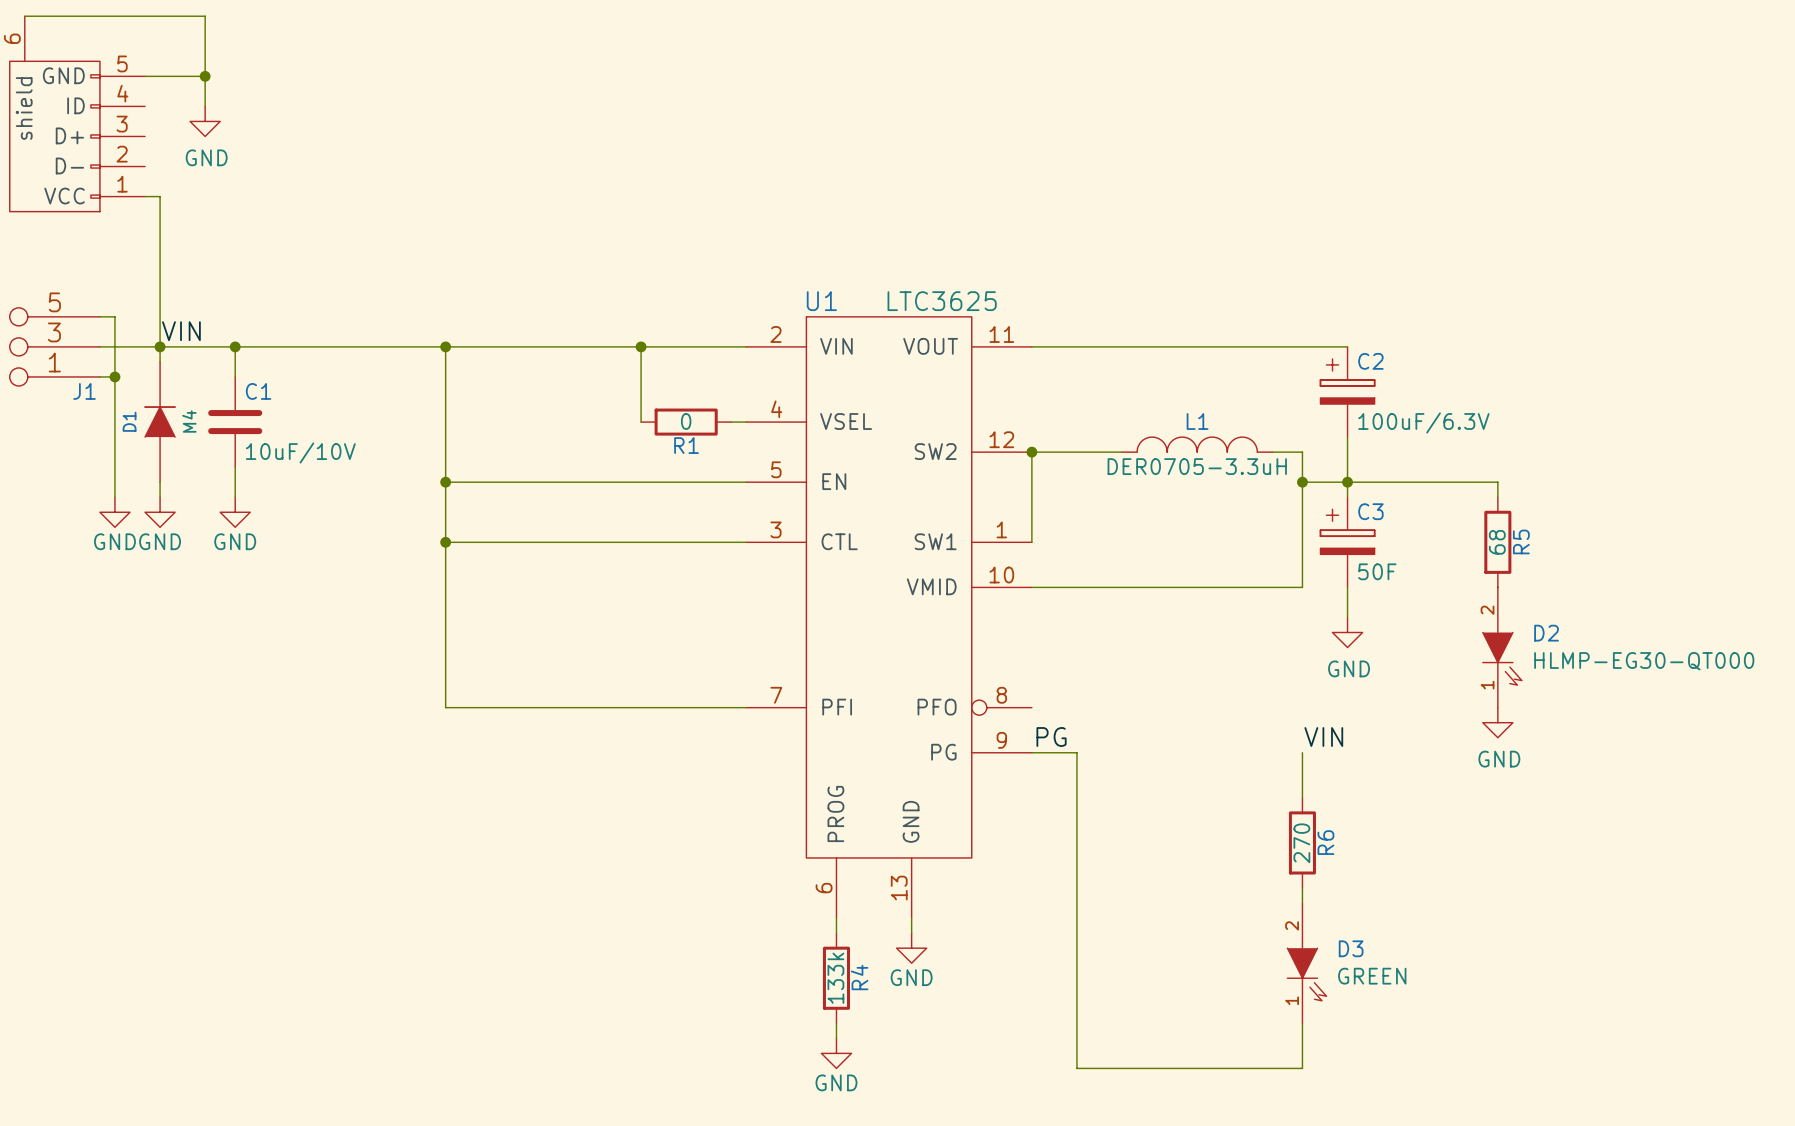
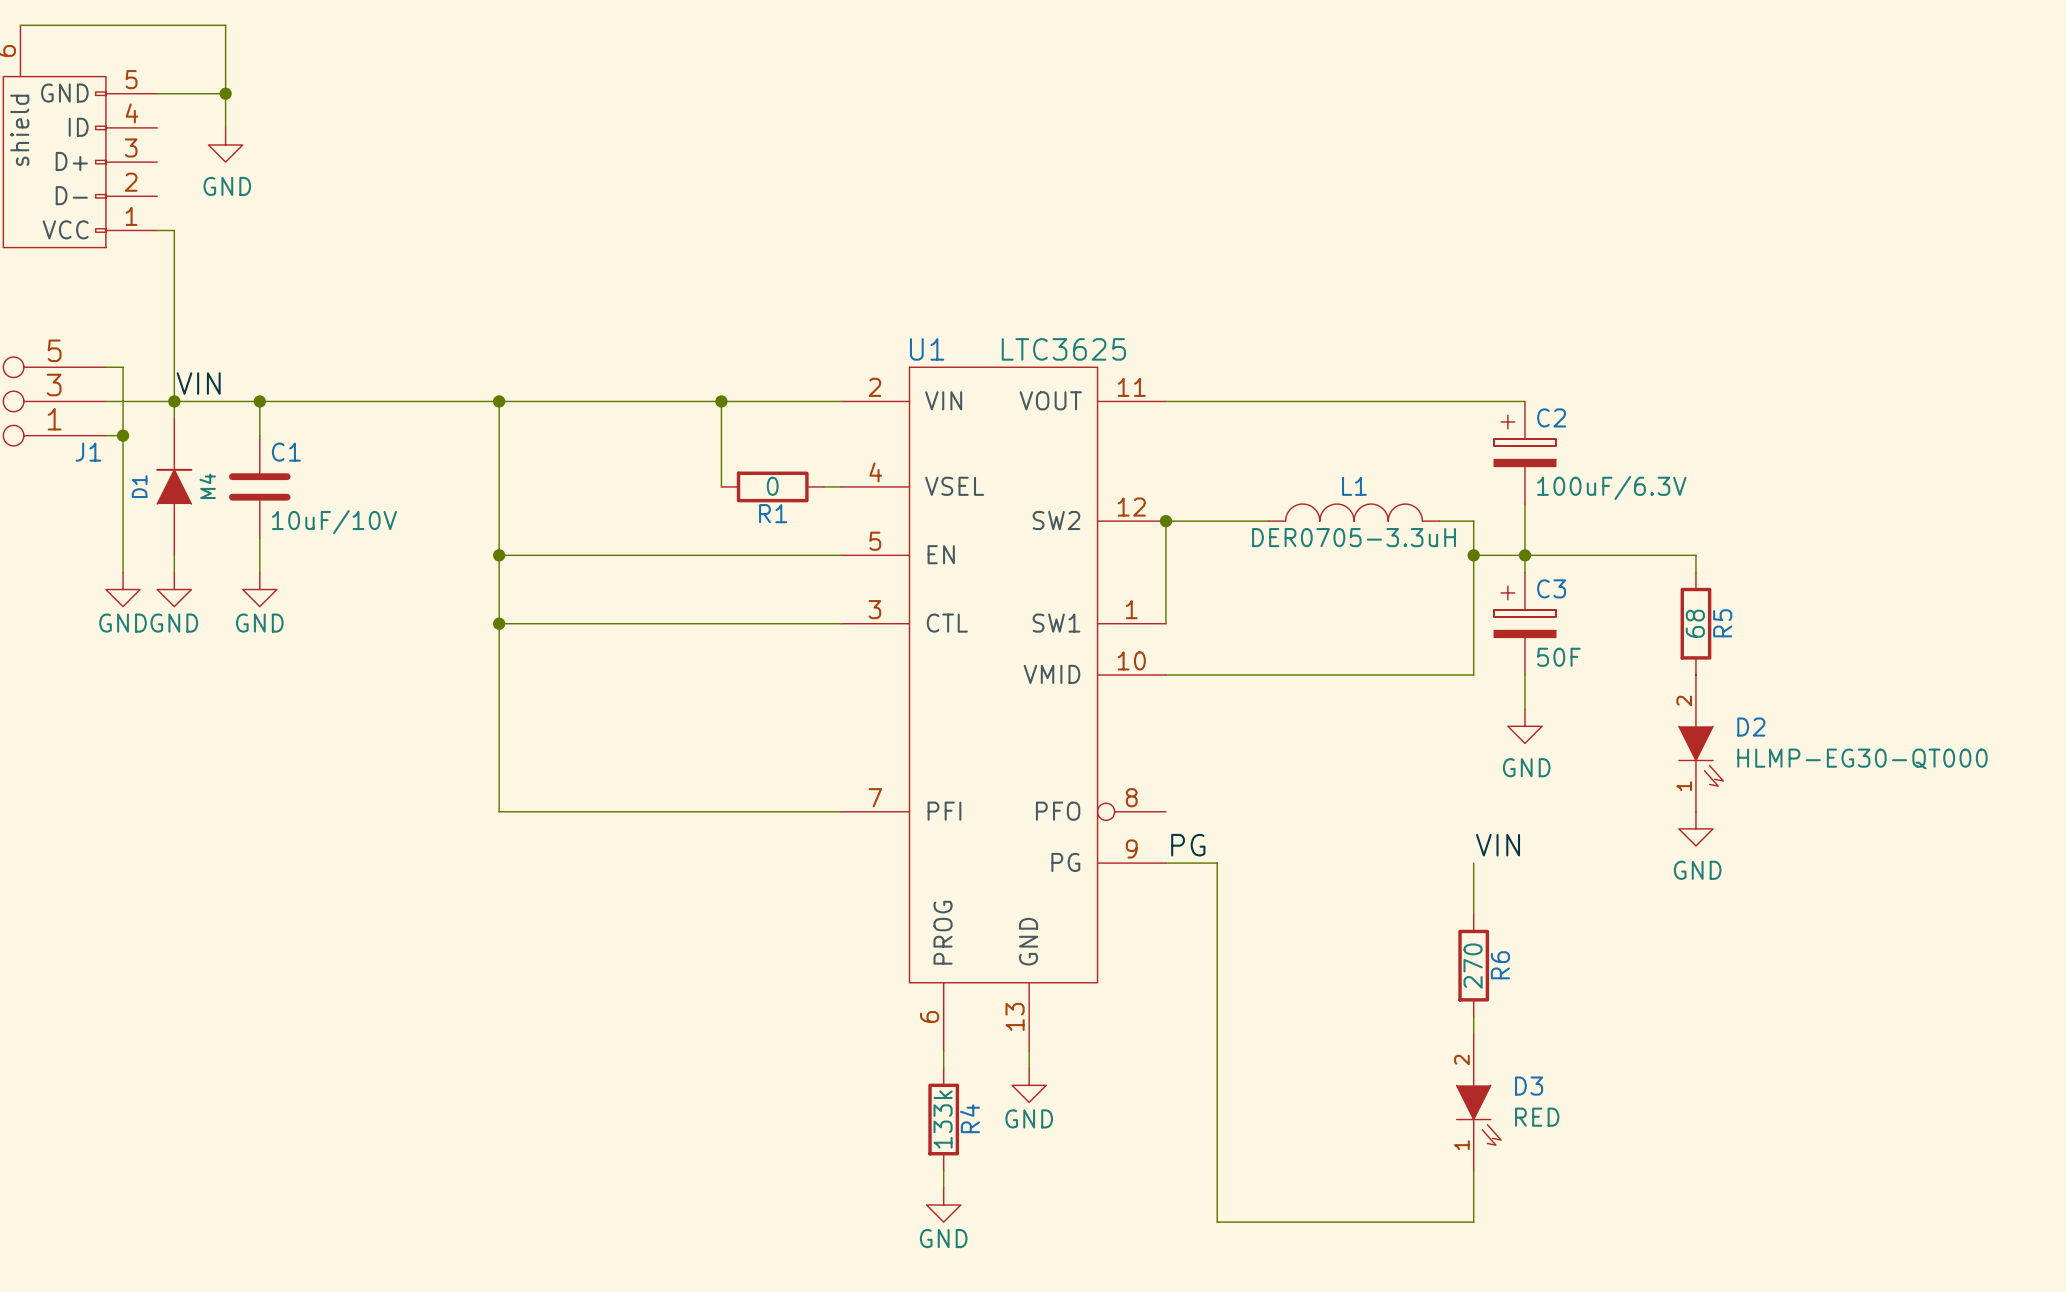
D3 value: GREEN (1372, 976) -> RED (1537, 1117)

